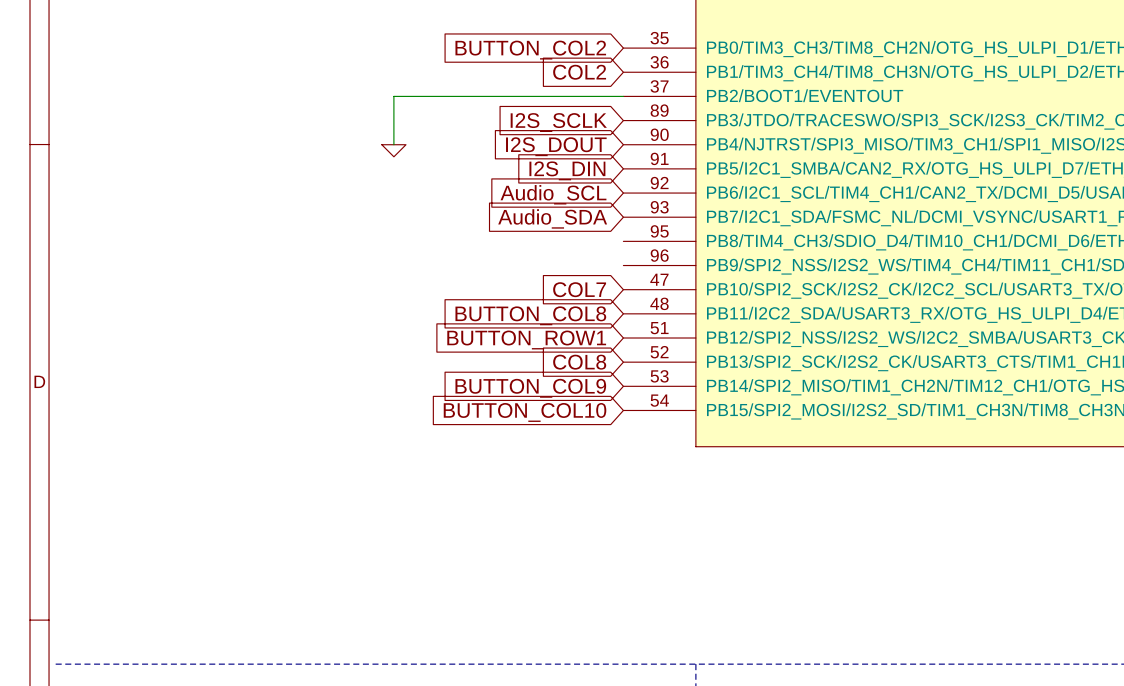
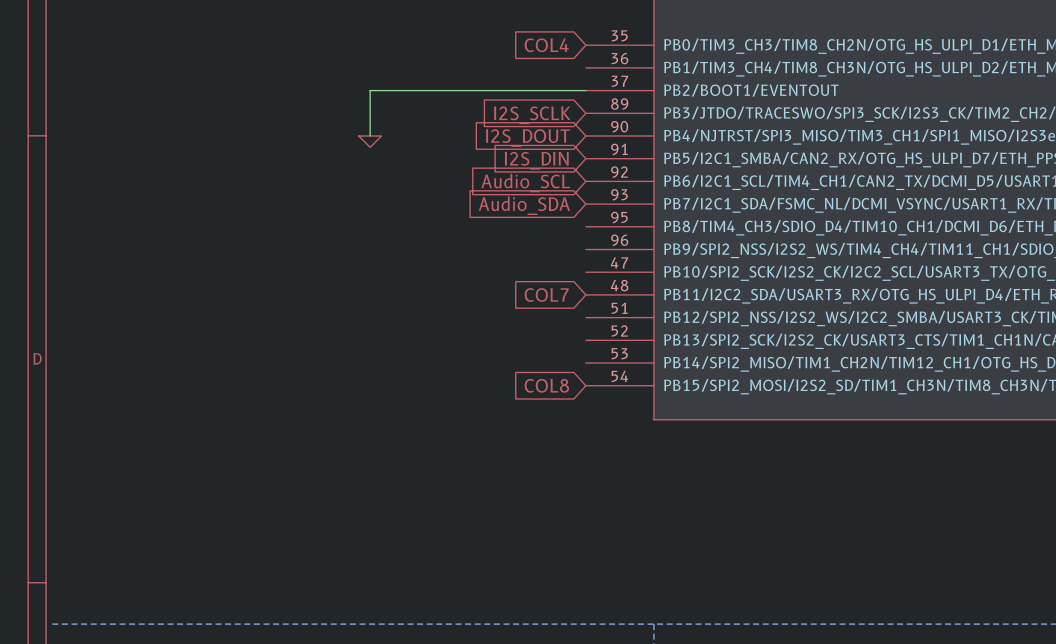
global label: BUTTON_COL2 (530, 50) -> COL4 (546, 45)
global label: COL2 (579, 72) -> none
global label: COL7 (579, 289) -> none
global label: BUTTON_COL8 (530, 315) -> COL7 (546, 294)
global label: BUTTON_ROW1 (526, 339) -> none
global label: COL8 (579, 362) -> none
global label: BUTTON_COL9 (530, 388) -> none
global label: BUTTON_COL10 (525, 412) -> COL8 (546, 385)

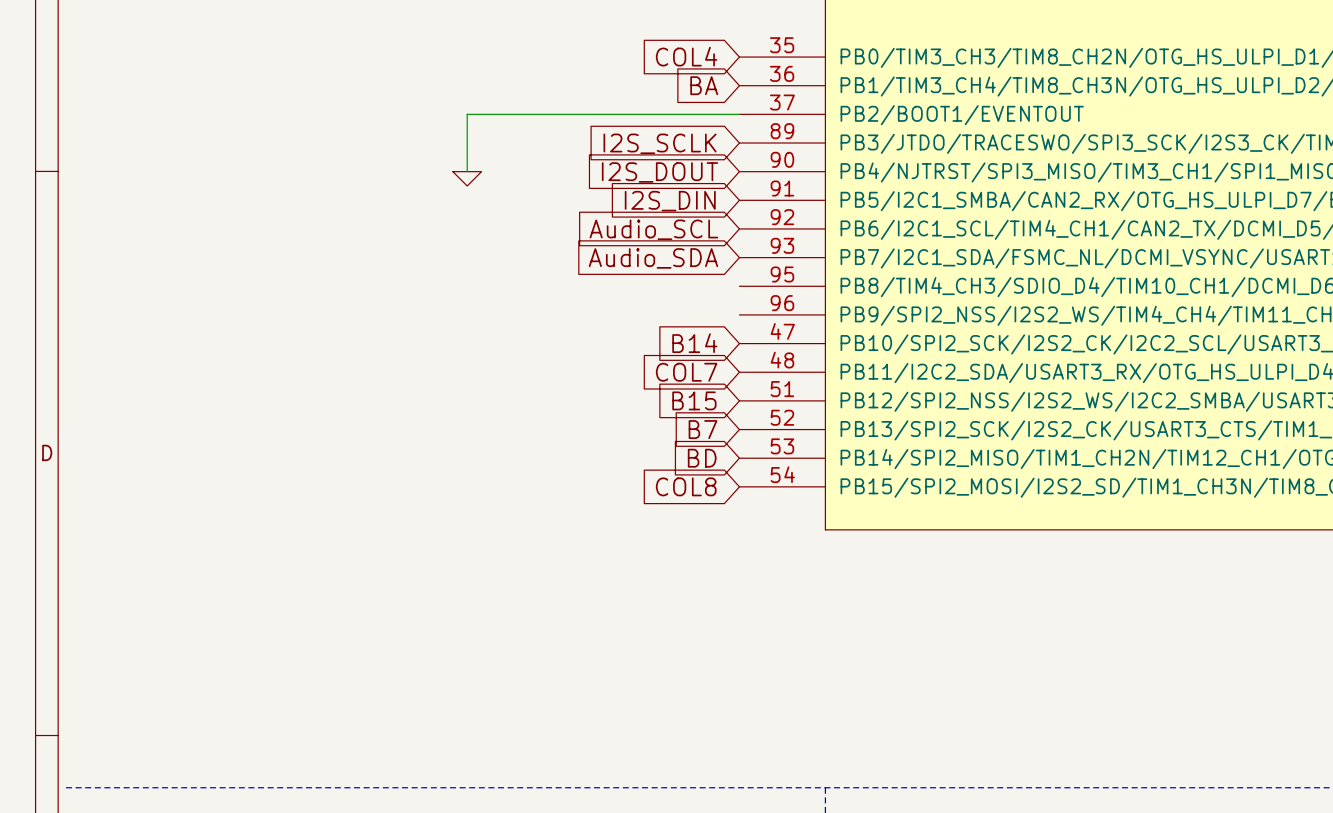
global label: none -> BA (704, 85)
global label: none -> B14 (694, 343)
global label: none -> B15 (694, 400)
global label: none -> B7 (703, 429)
global label: none -> BD (702, 458)

